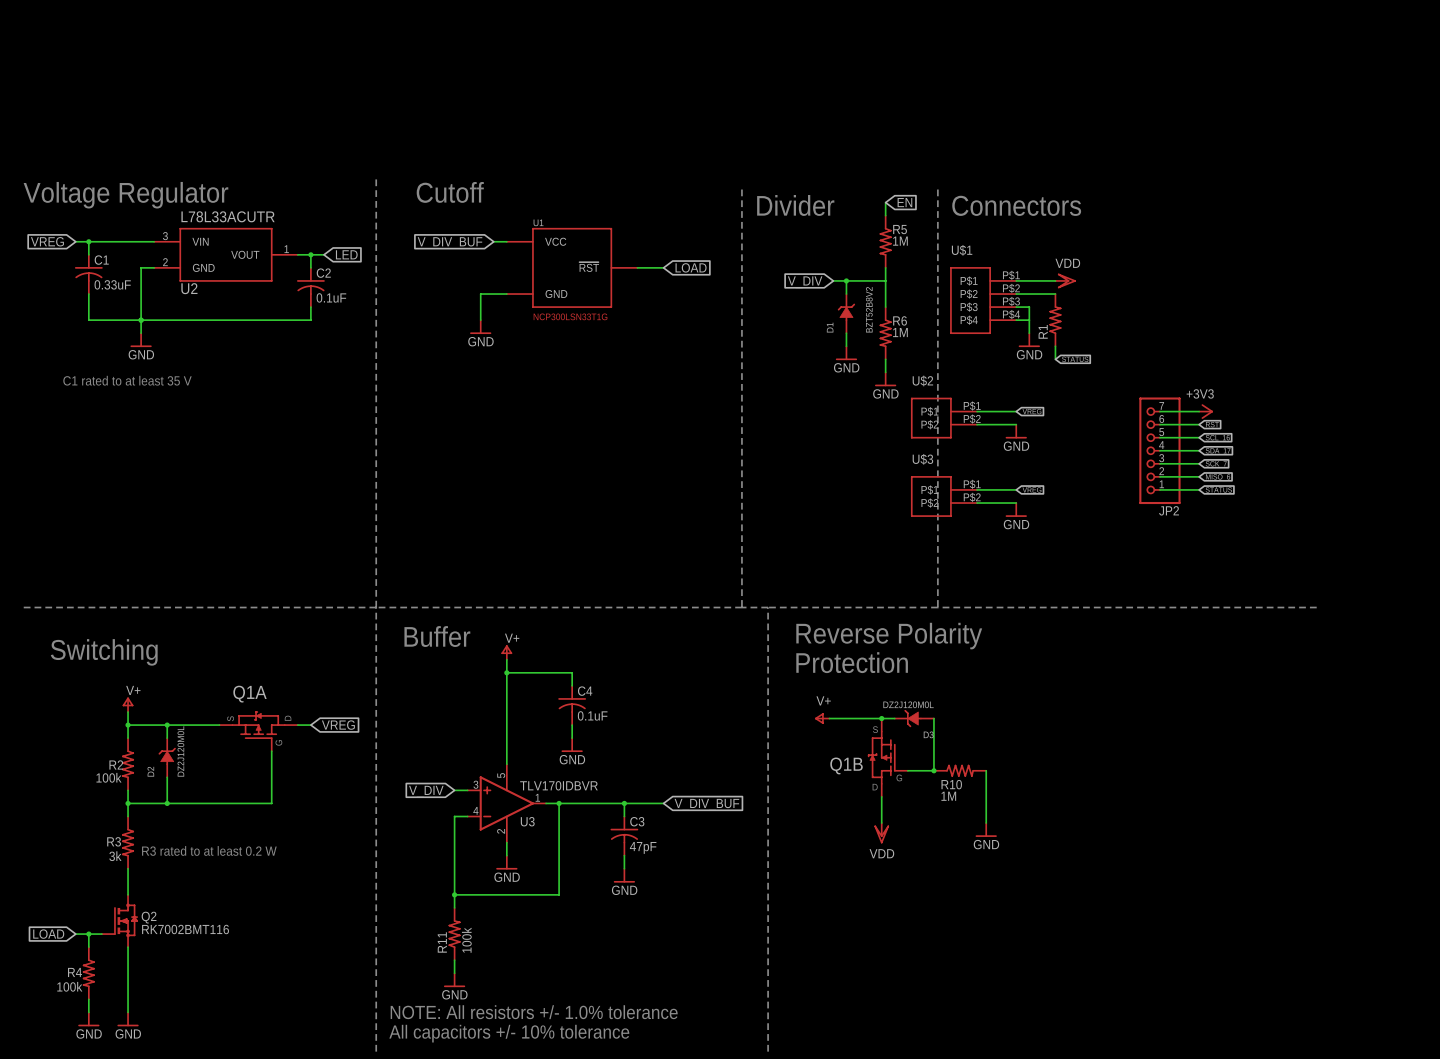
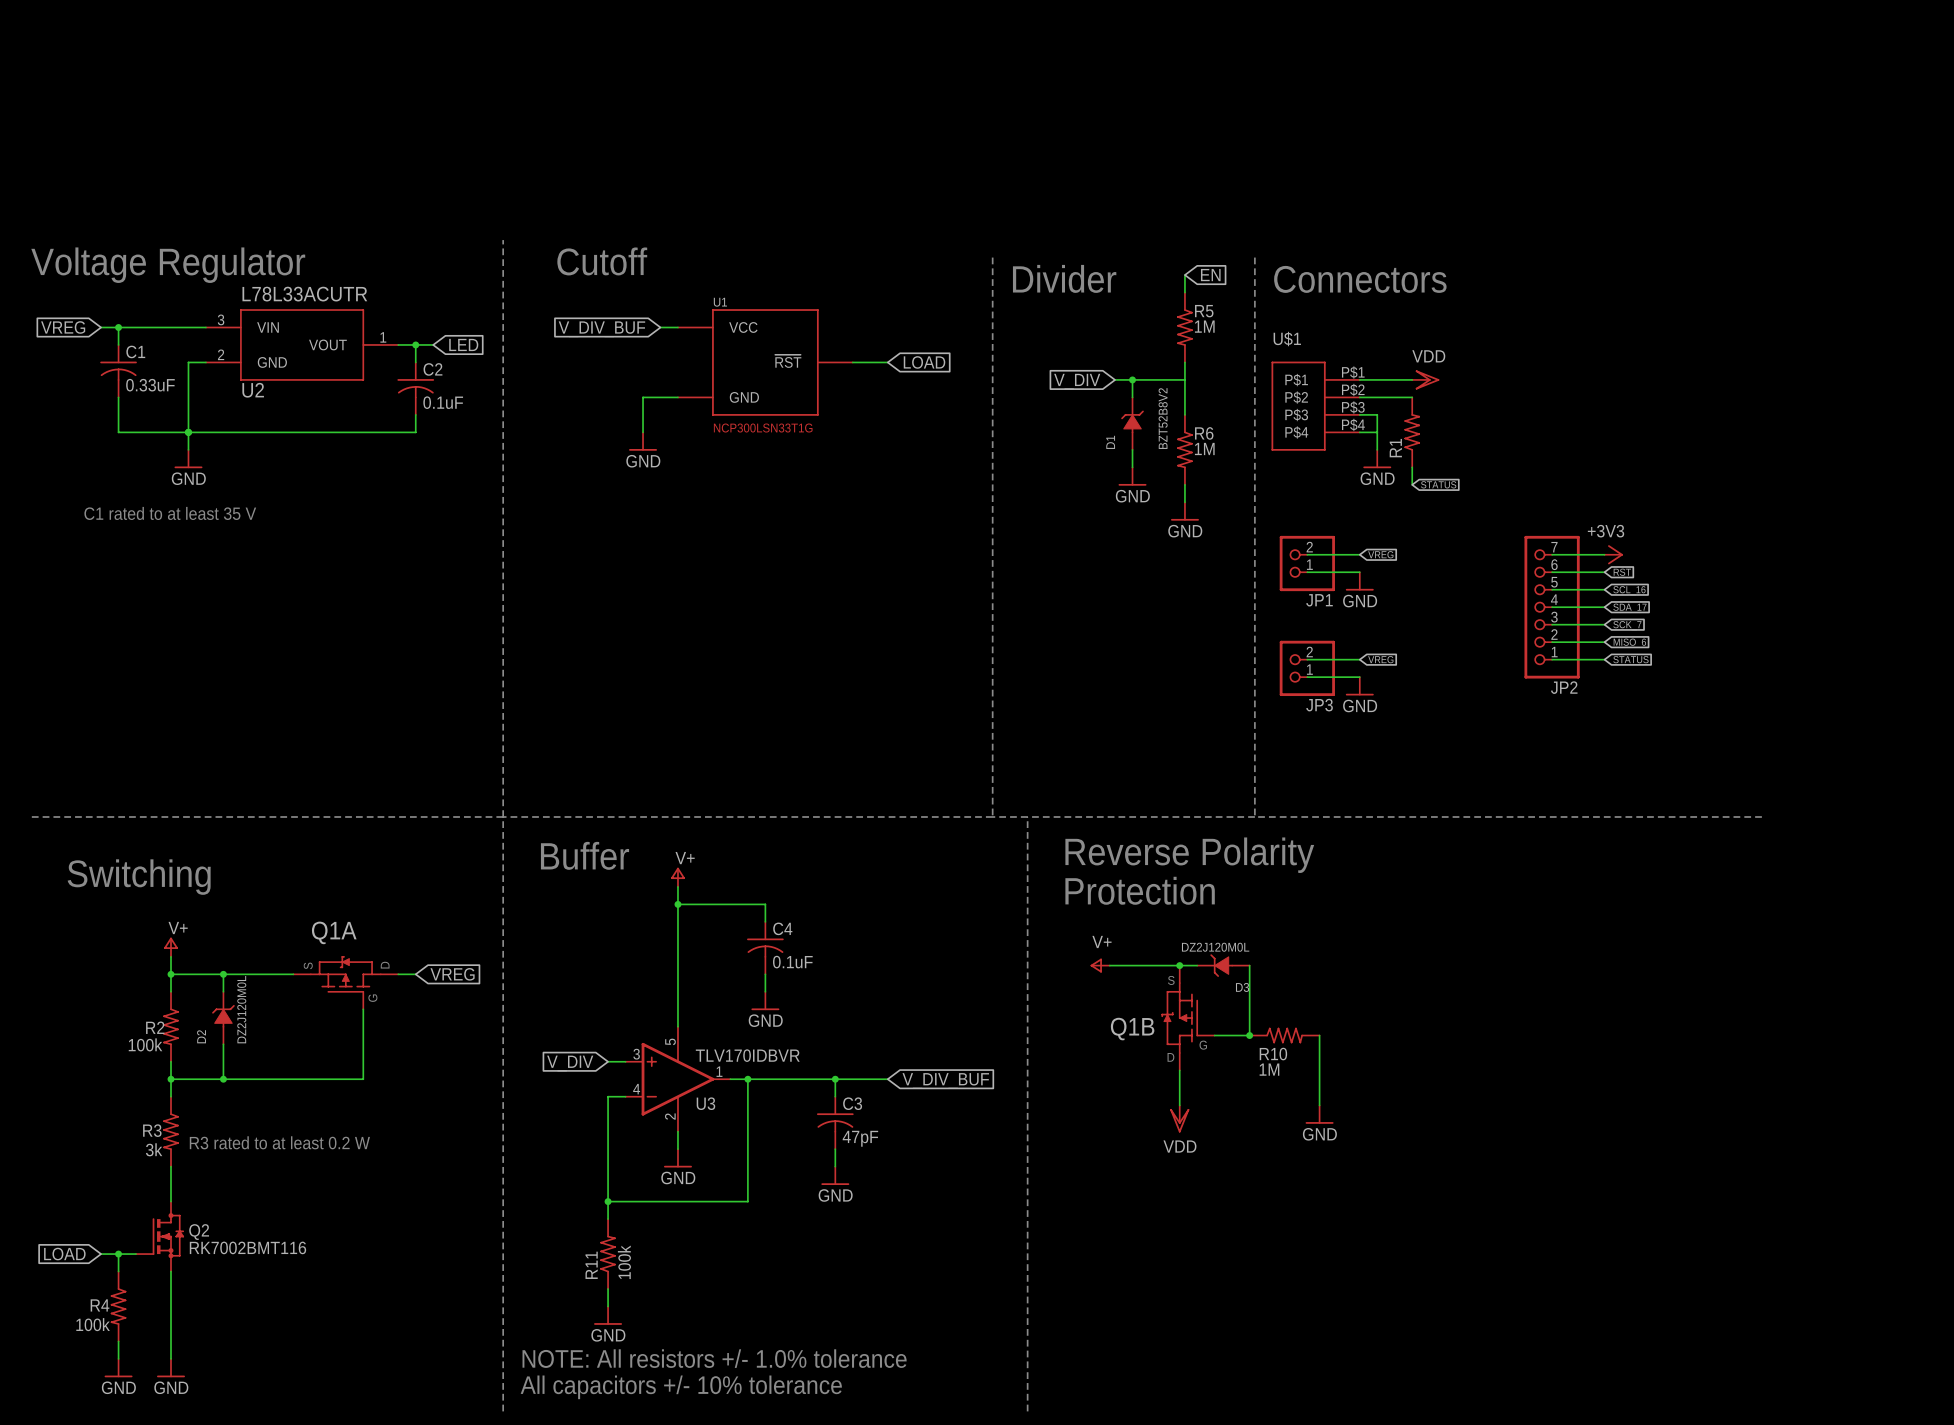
U$2: (944, 418) -> none
JP1: none -> (1307, 563)
U$3: (944, 496) -> none
JP3: none -> (1307, 668)

